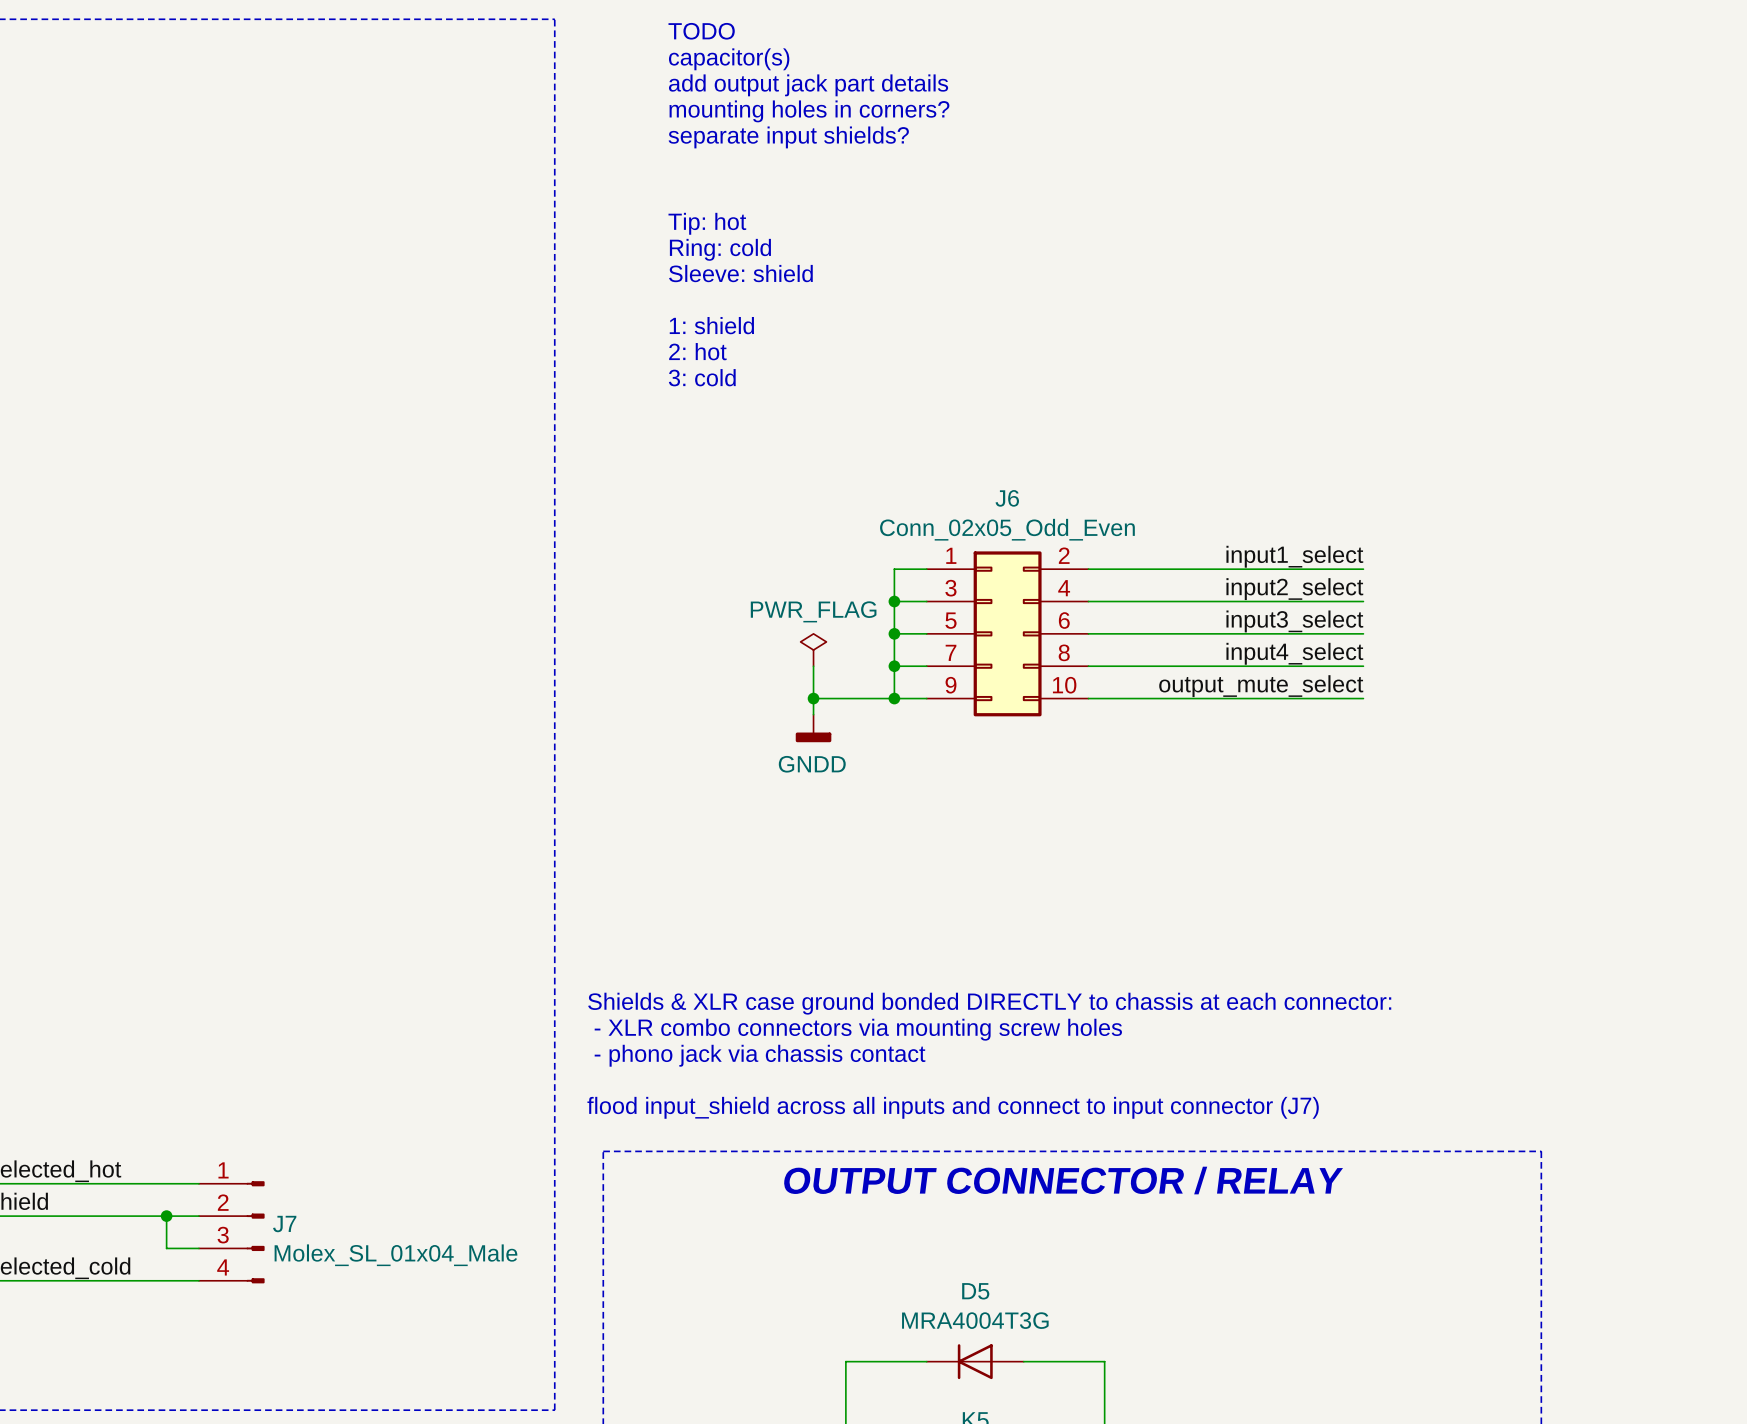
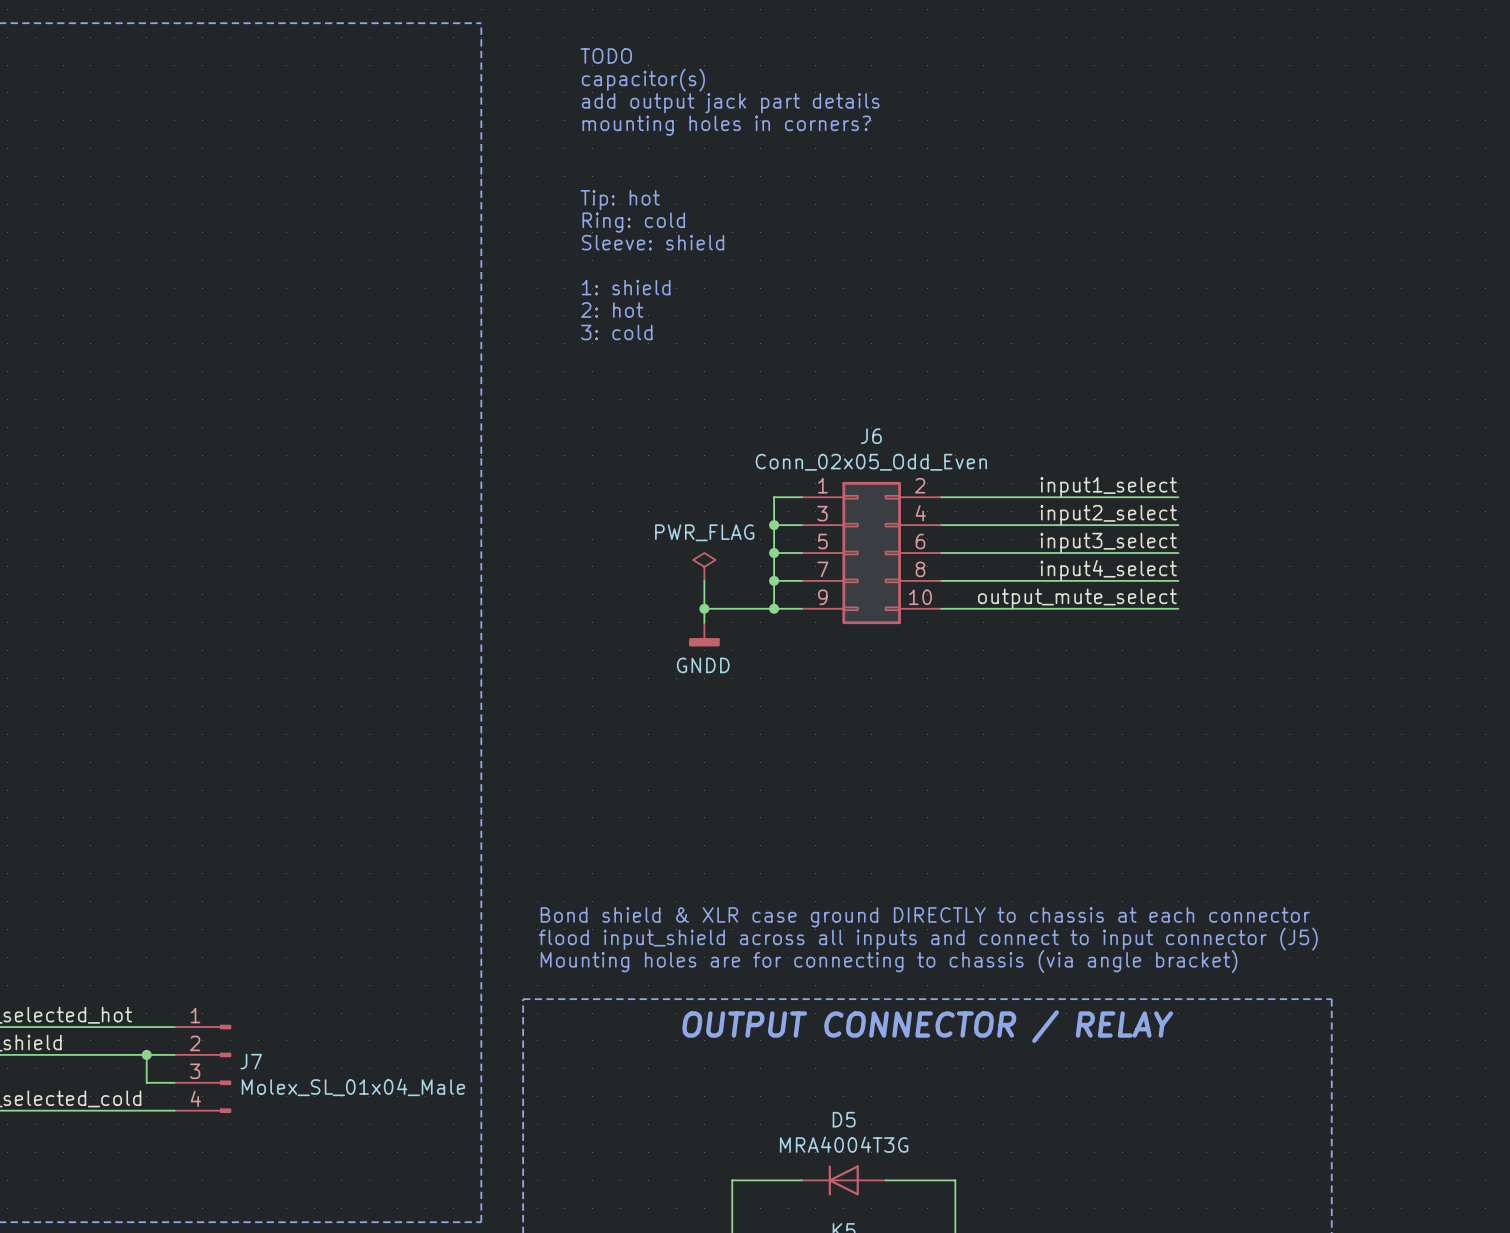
text: TODO (701, 31) -> none
text: capacitor(s) (729, 59) -> TODO (606, 55)
text: add output jack part details (808, 85) -> capacitor(s) (643, 80)
text: mounting holes in corners? (809, 111) -> add output jack part details (730, 103)
text: separate input shields? (788, 137) -> mounting holes in corners? (726, 125)
text: Shields & XLR case ground bonded DIRECTLY to chassis at each connector: (989, 1003) -> none
text: - XLR combo connectors via mounting screw holes (858, 1029) -> none
text: - phono jack via chassis contact (760, 1055) -> none
text: none -> Bond shield & XLR case ground DIRECTLY to chassis at each connector (925, 917)
text: none -> Mounting holes are for connecting to chassis (via angle bracket) (889, 961)
text: flood input_shield across all inputs and connect to input connector (J7) (953, 1107) -> flood input_shield across all inputs and connect to input connector (J5) (928, 939)

